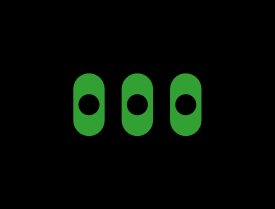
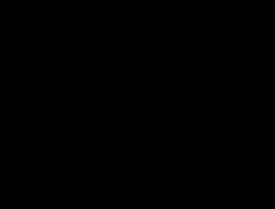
part: (137, 104) -> none

